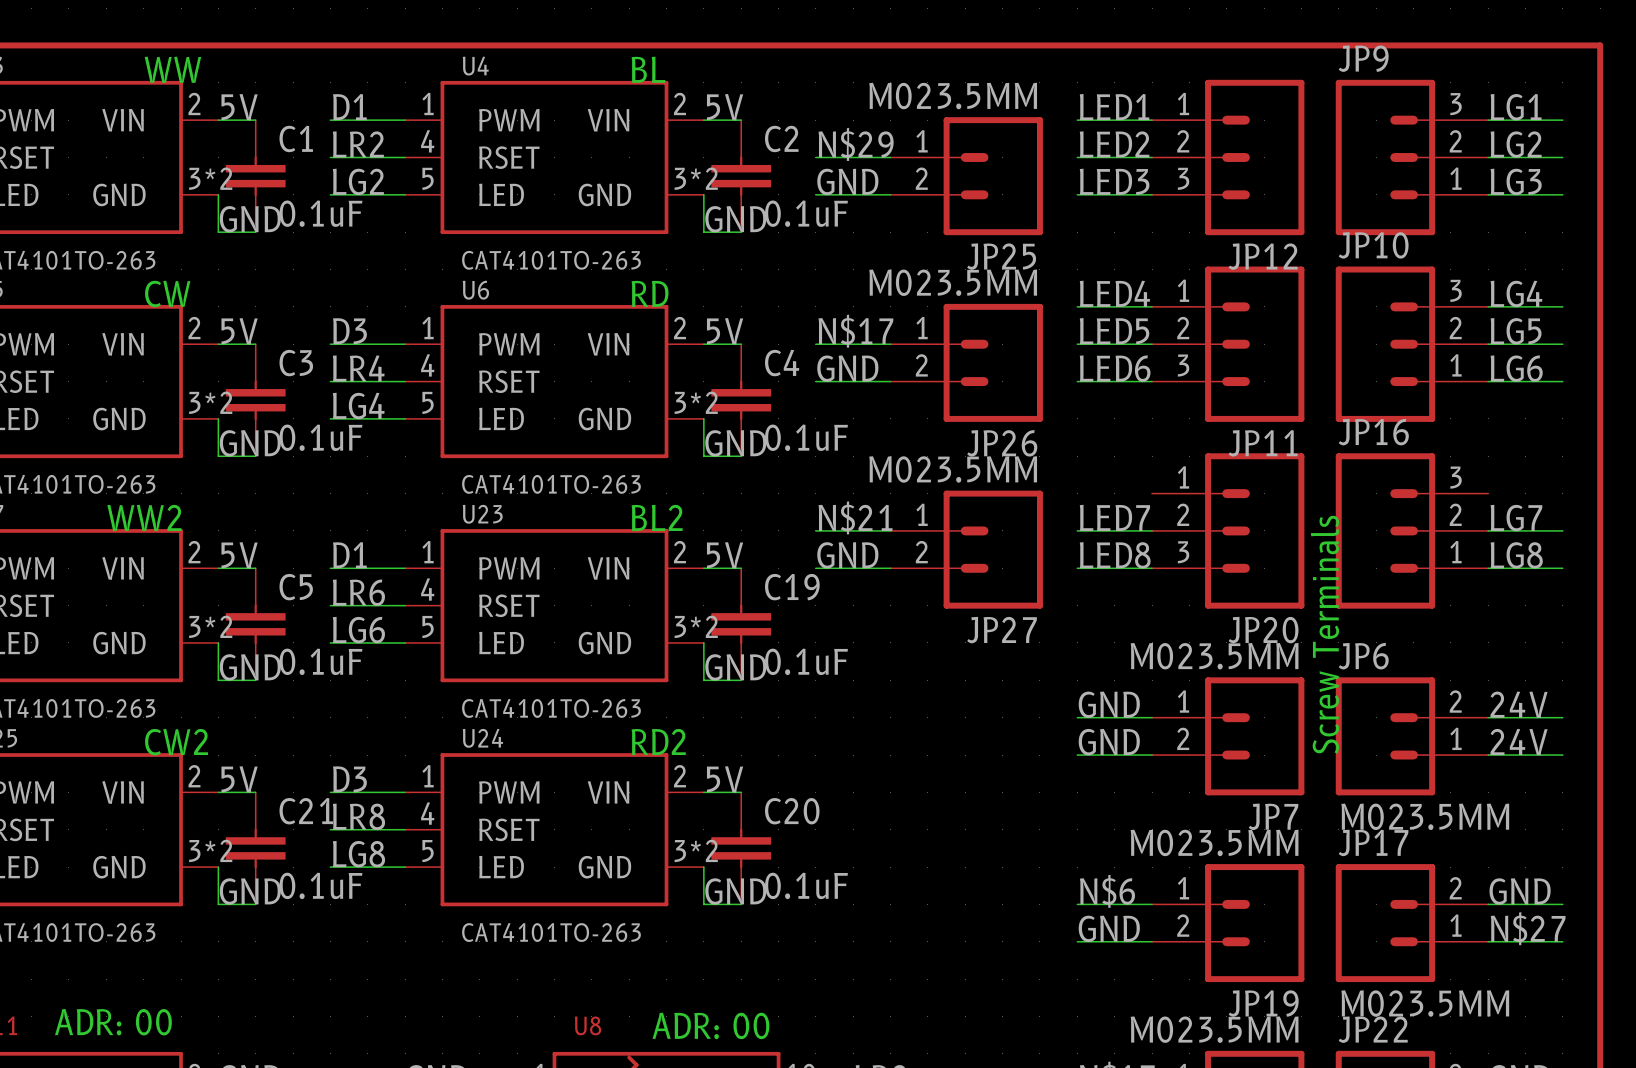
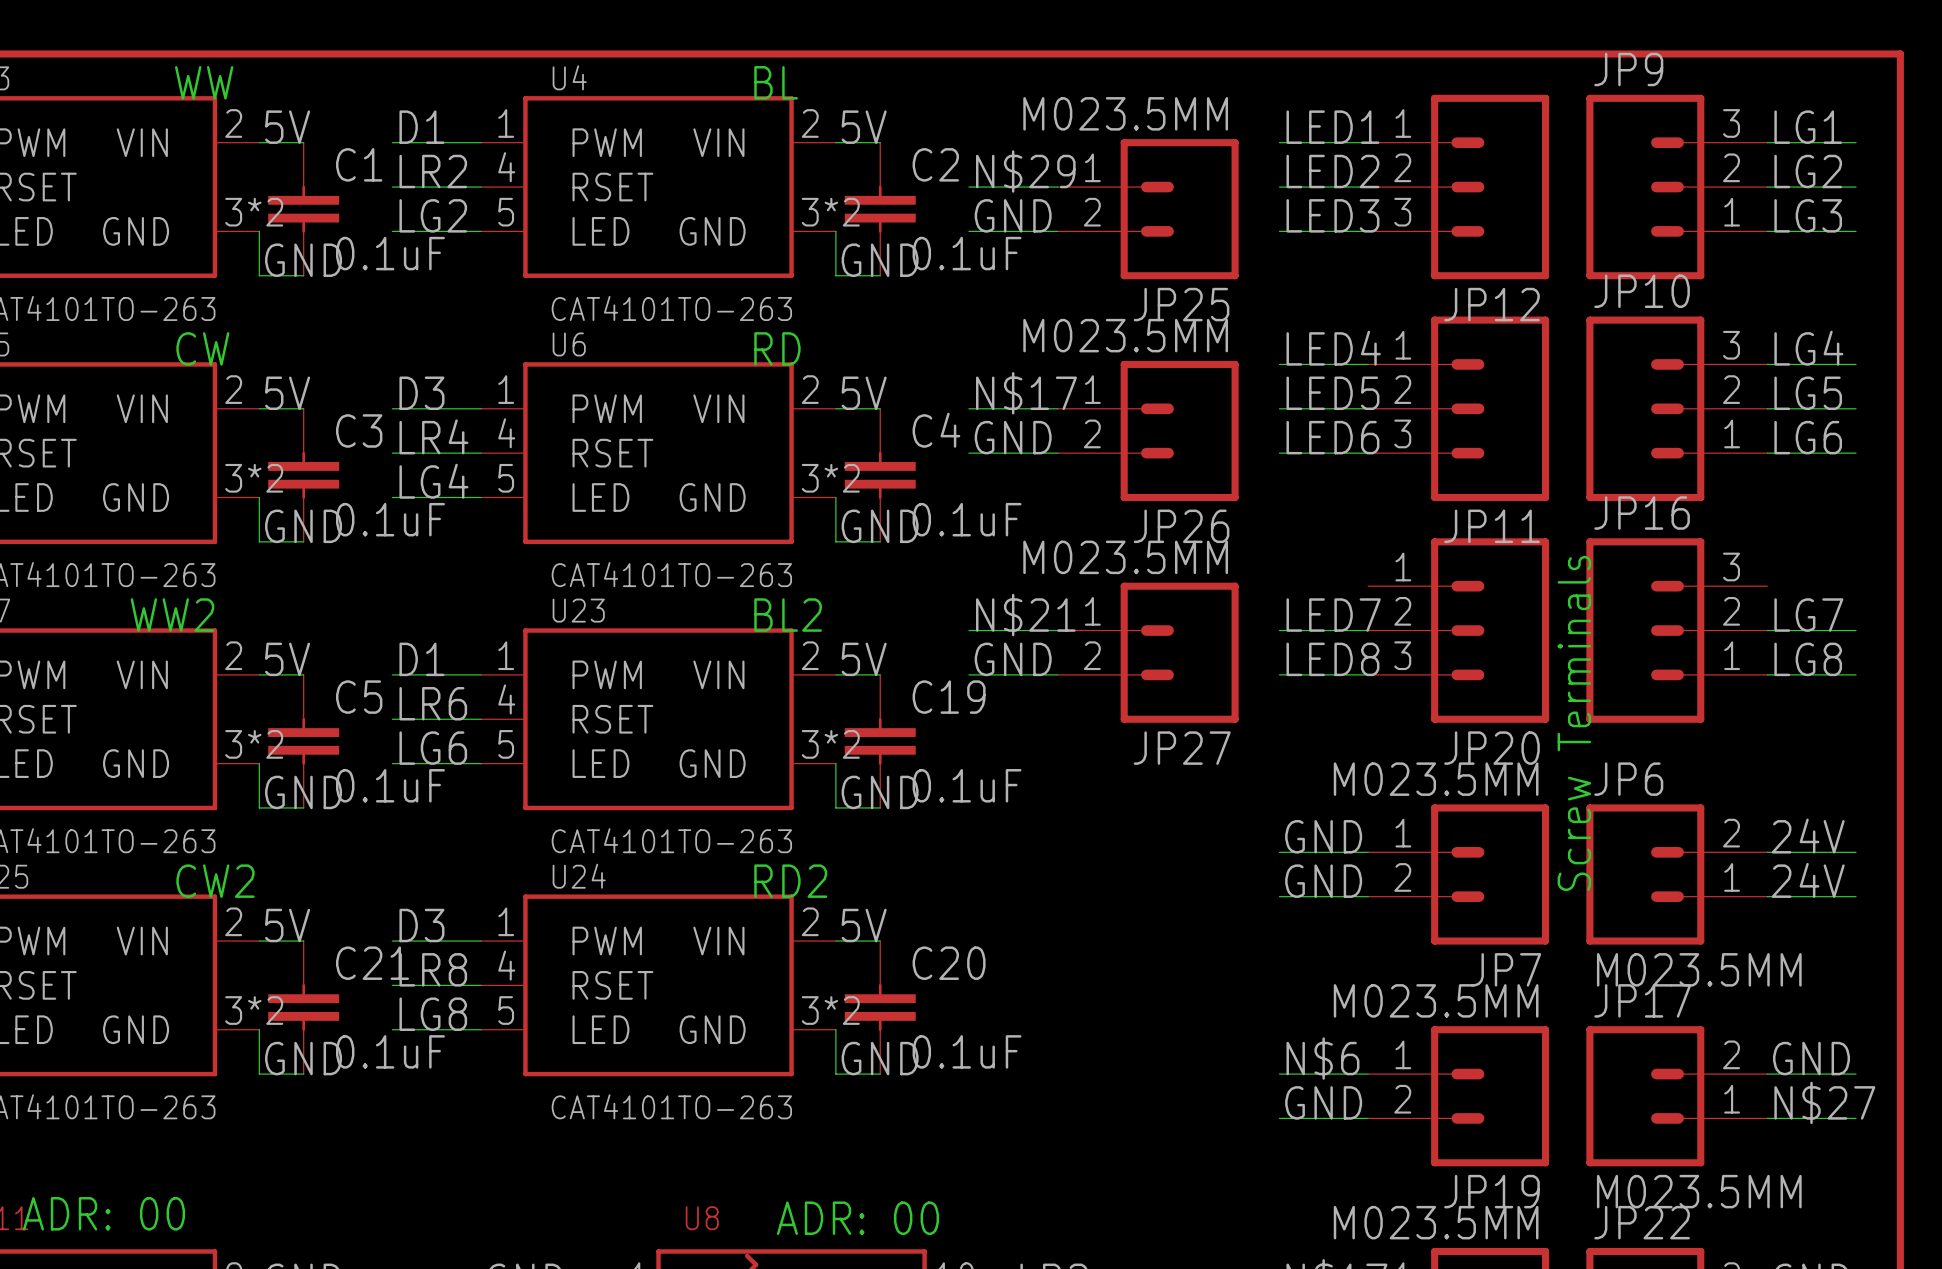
text position: ADR: 00 (113, 1022) -> ADR: 00 (103, 1213)

